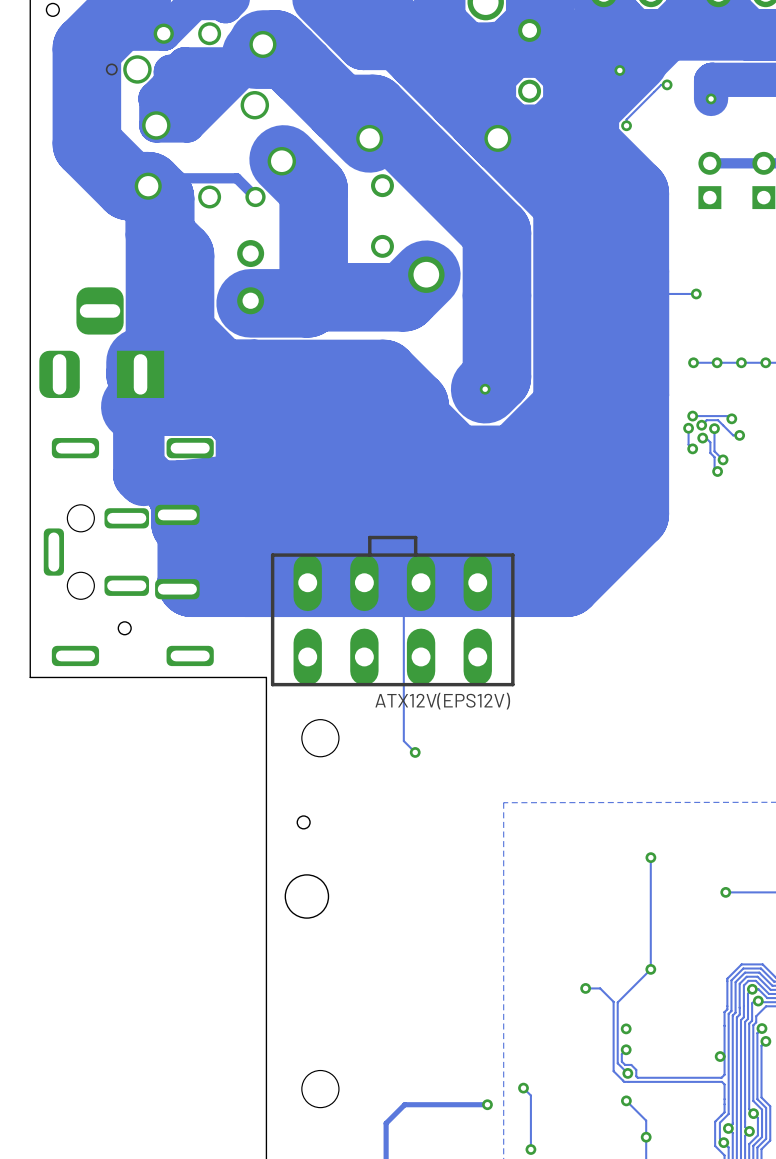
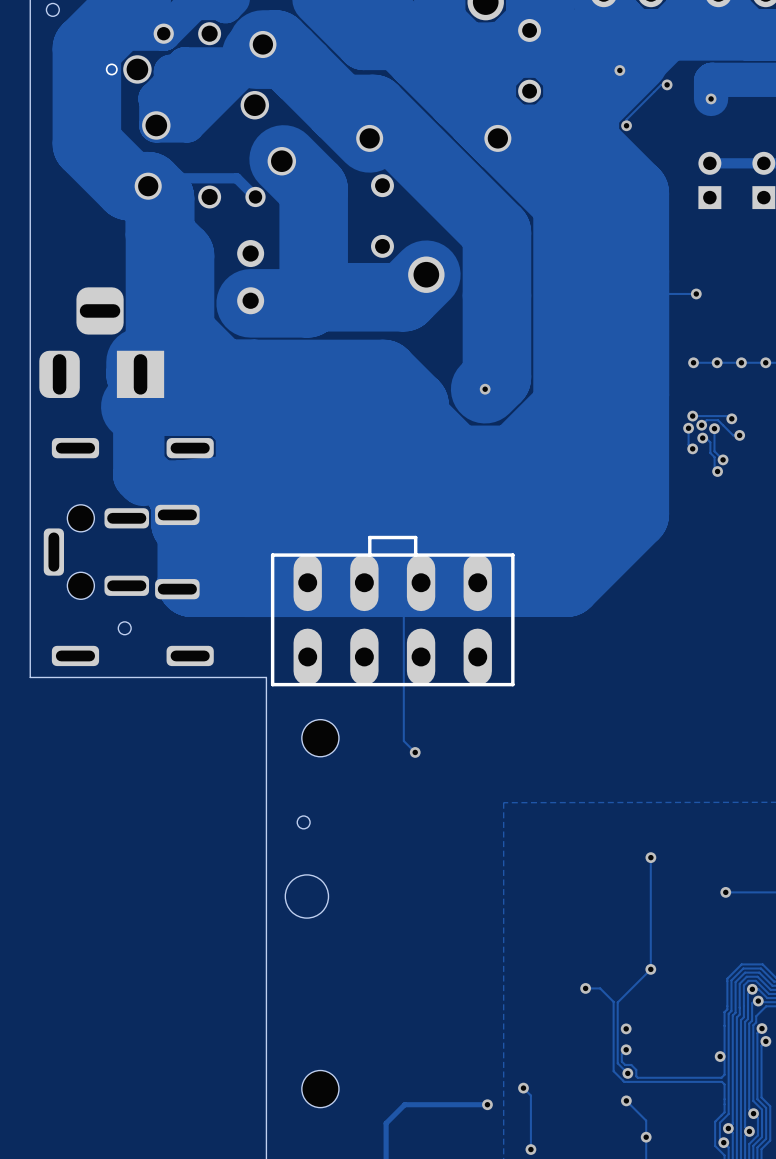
text: ATX12V(EPS12V) (442, 701) -> none

